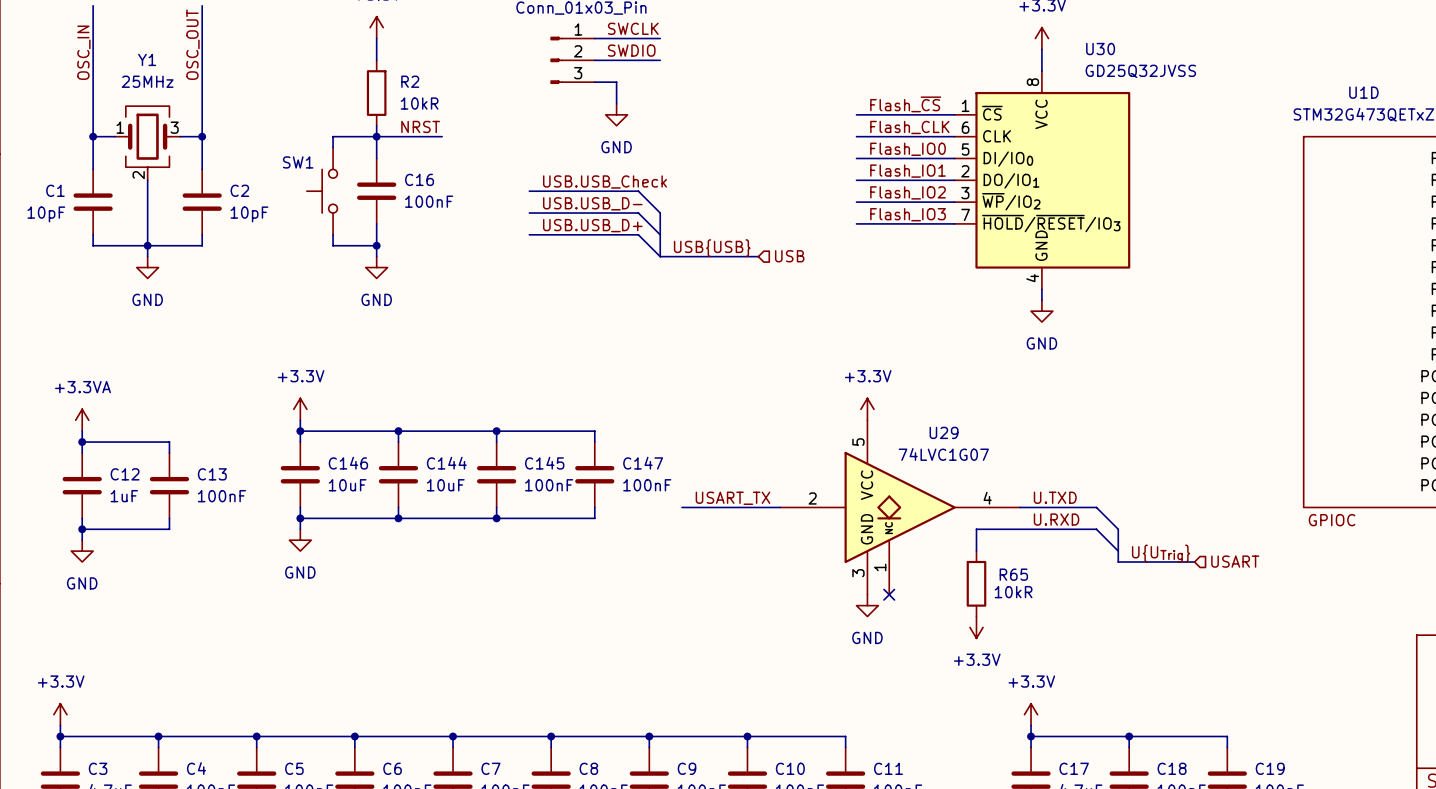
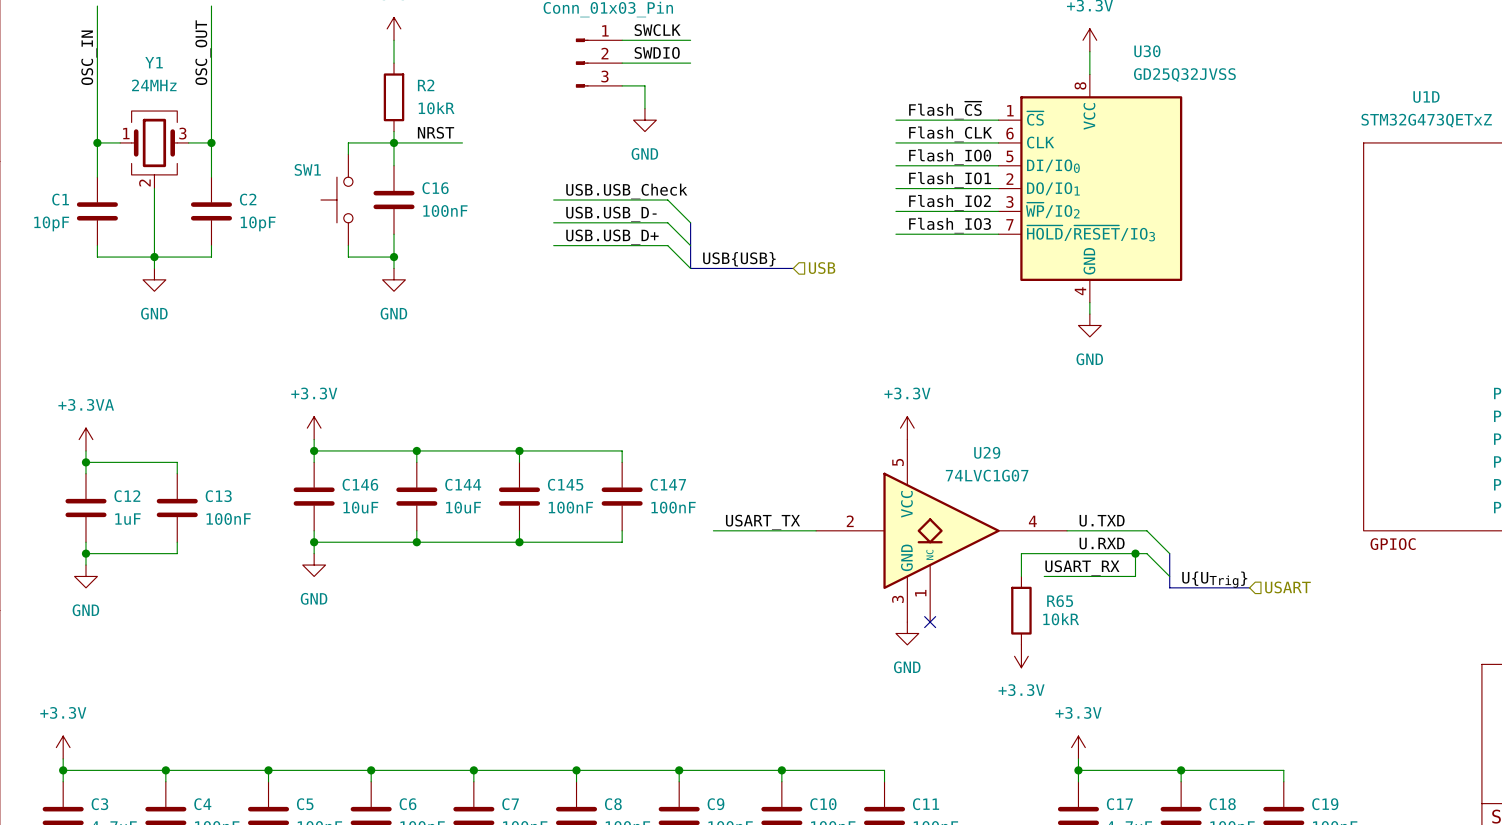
Y1 value: 25MHz (147, 81) -> 24MHz (154, 85)
wire: none -> (1135, 553) (1135, 576) (1044, 576)
junction: none -> (1135, 553)
label: none -> USART_RX (1082, 568)

